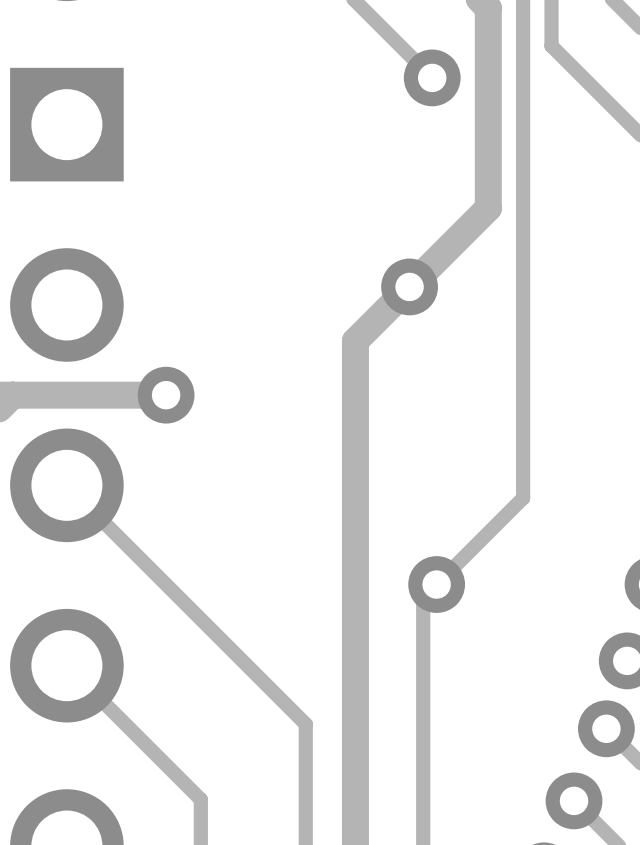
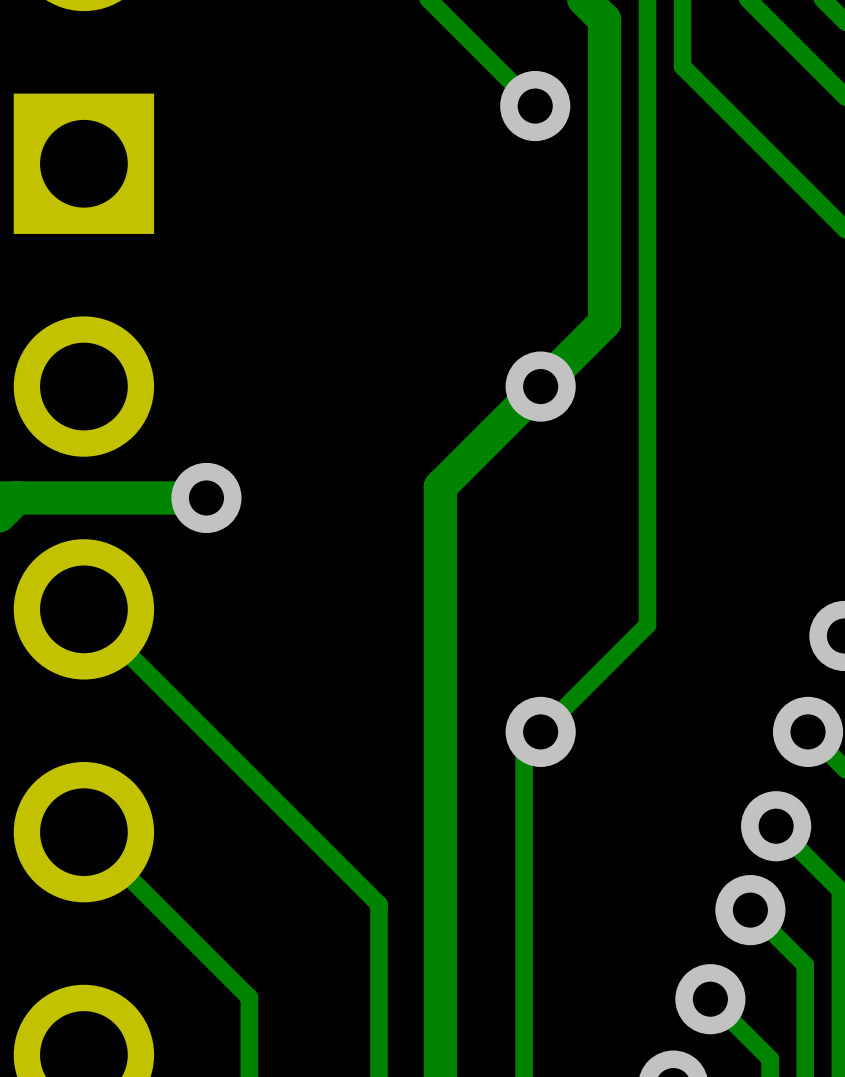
track: (488, 208) (355, 341) (355, 386) -> (604, 267) (604, 322) (440, 486)
via position: (409, 286) -> (540, 386)

